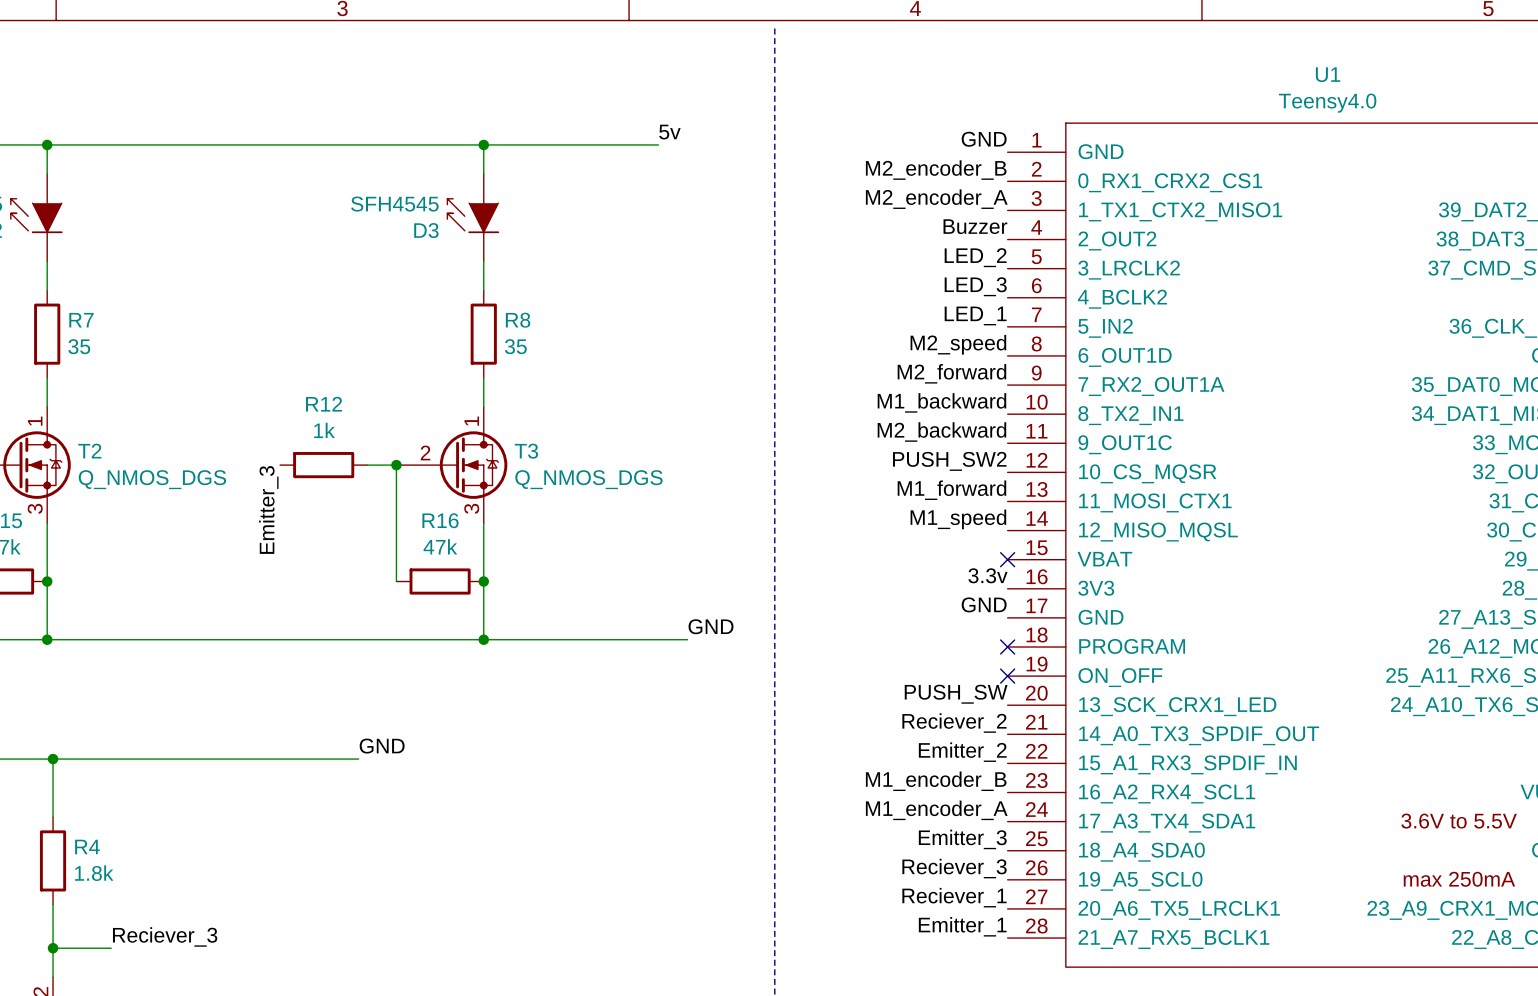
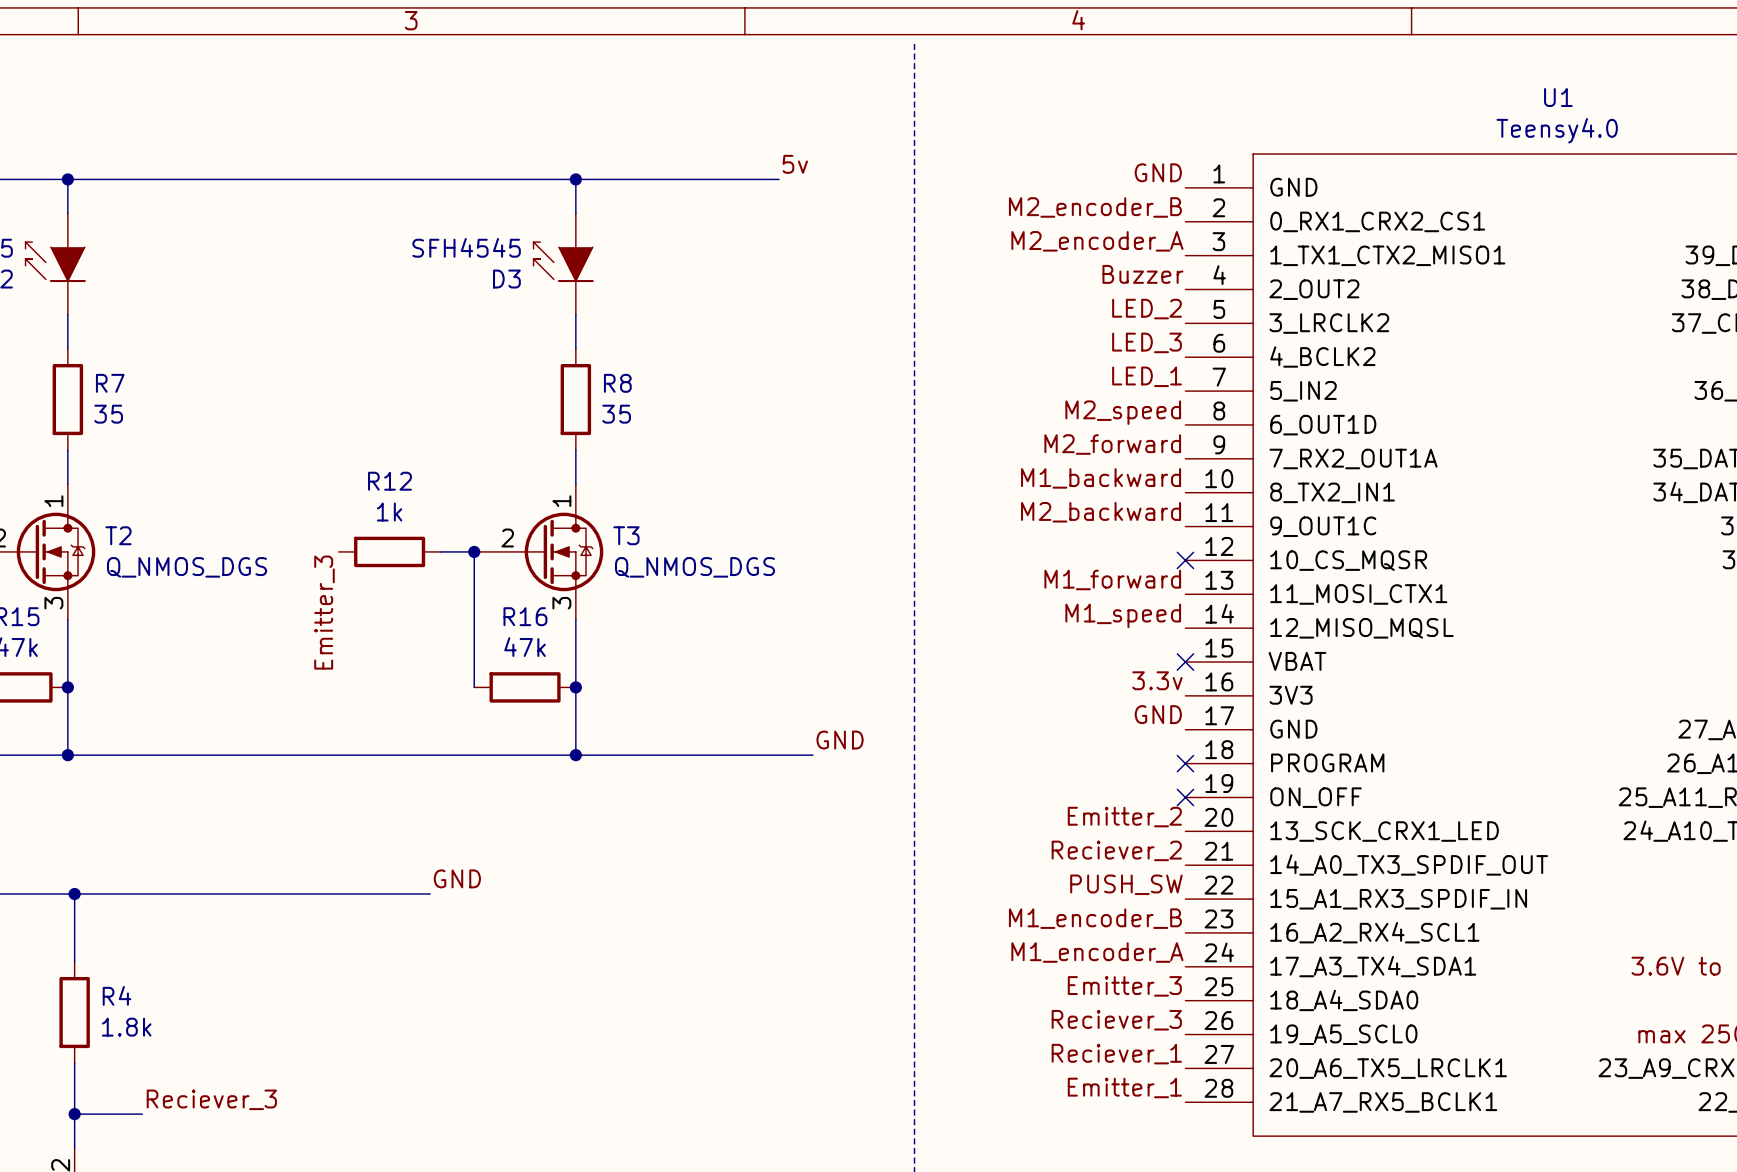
label: PUSH_SW2 (949, 461) -> none
no-connect mark: none -> (1185, 560)
label: PUSH_SW (956, 694) -> Emitter_2 (1124, 817)
label: Emitter_2 (962, 752) -> PUSH_SW (1126, 884)

